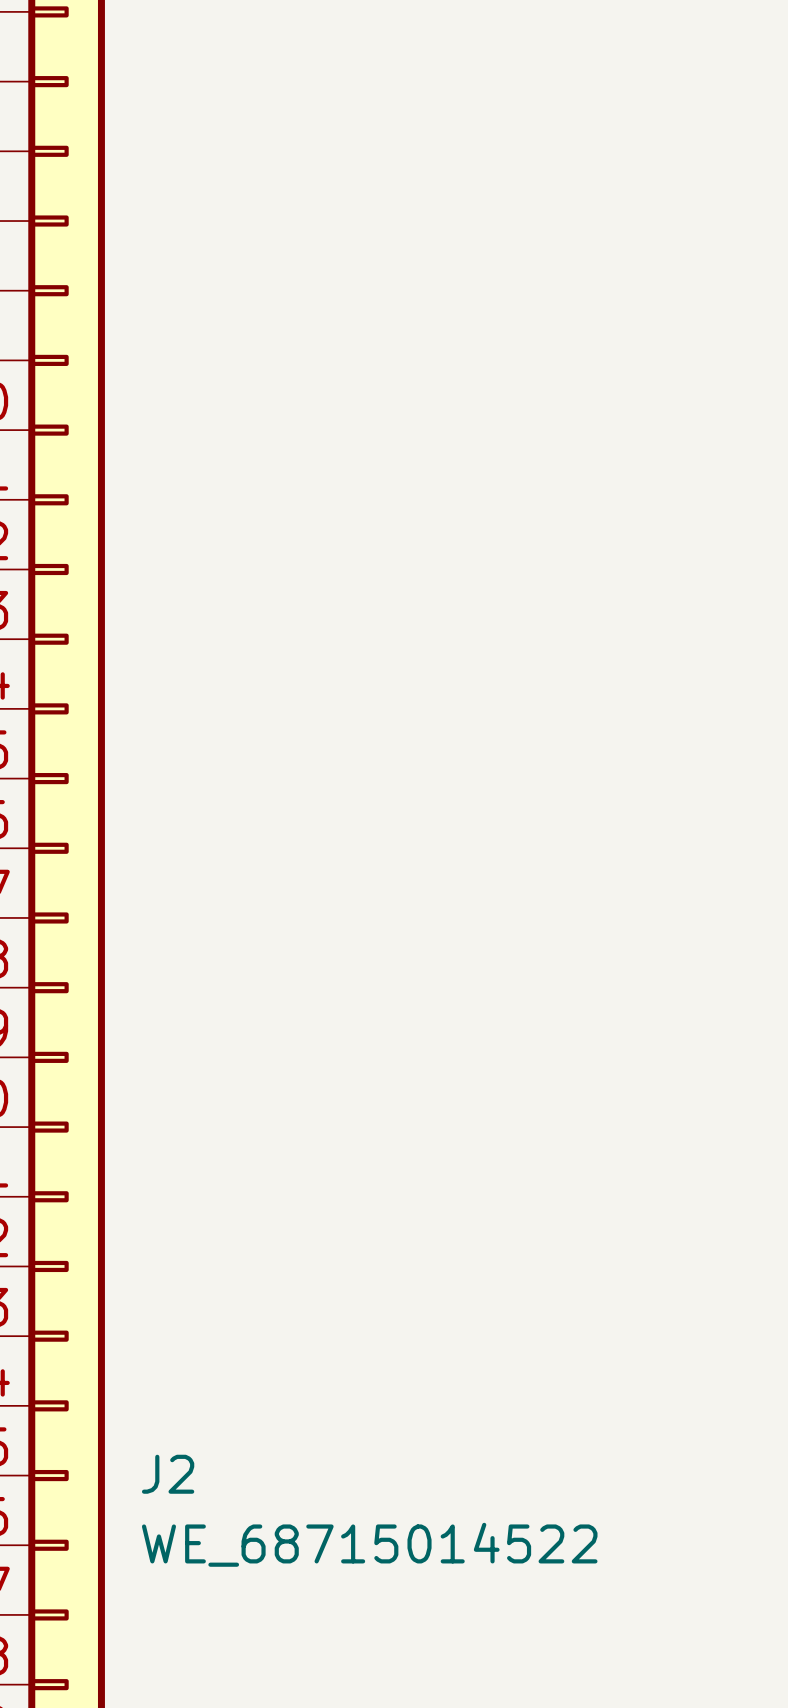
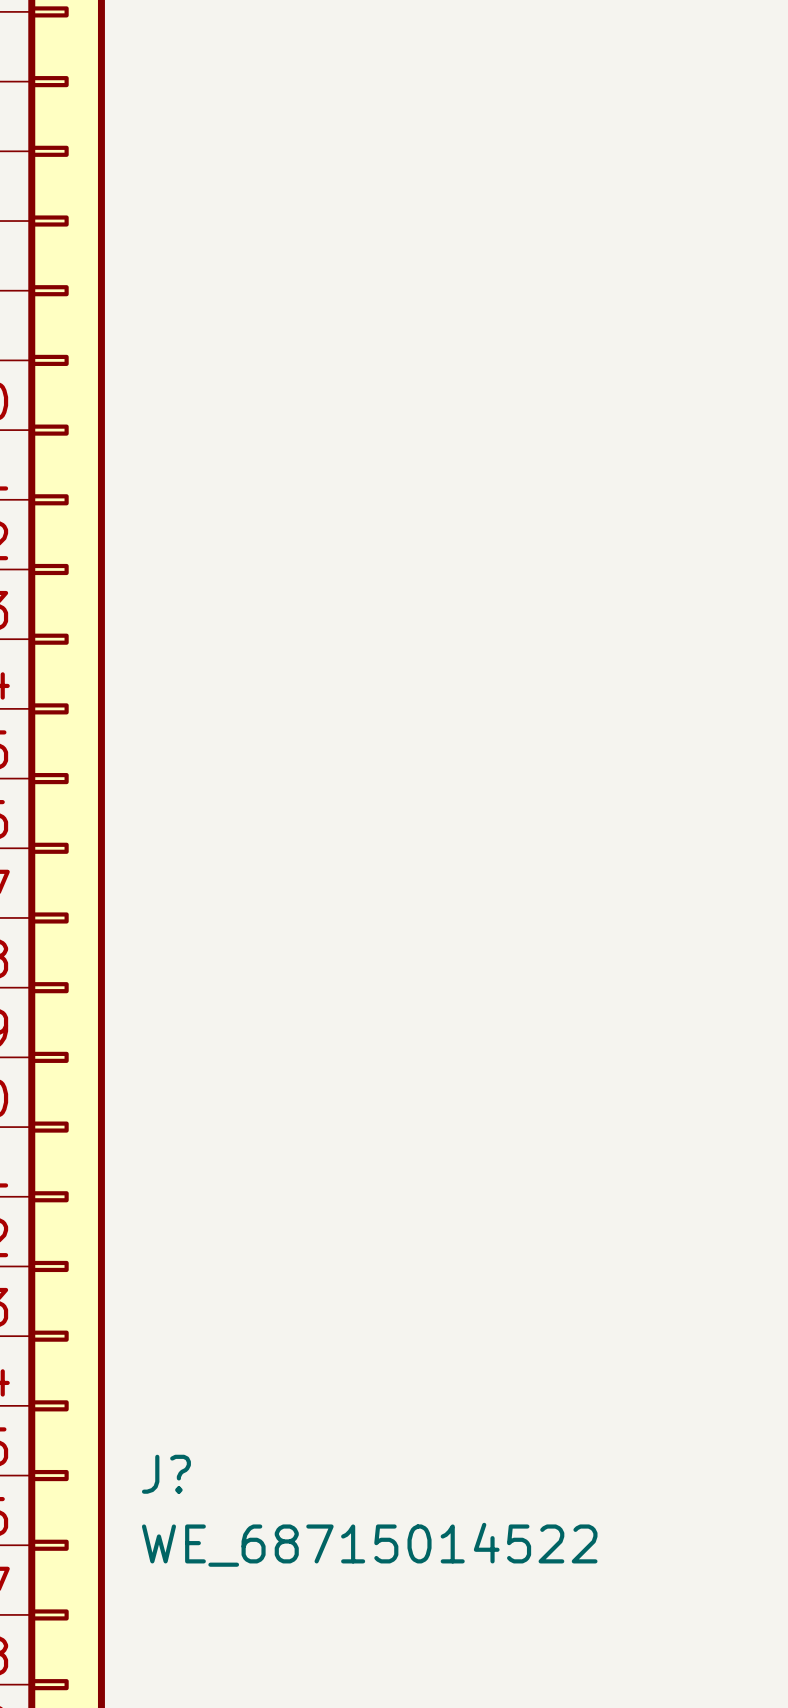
J2 name: J2 (168, 1474) -> J? (166, 1474)

